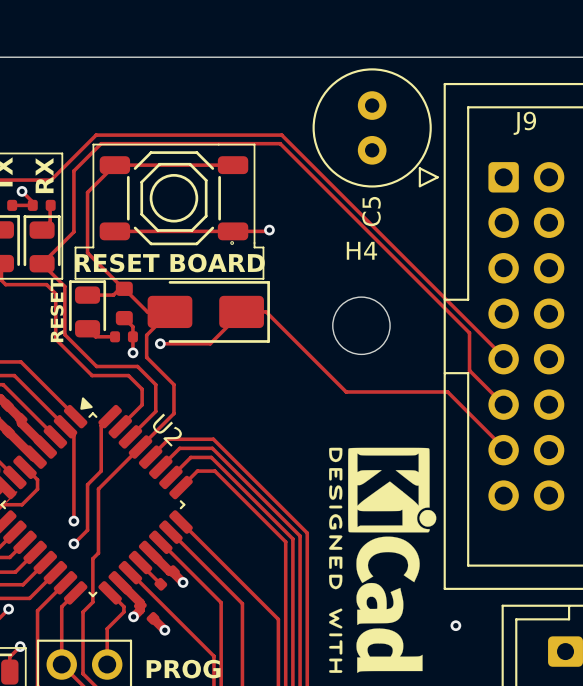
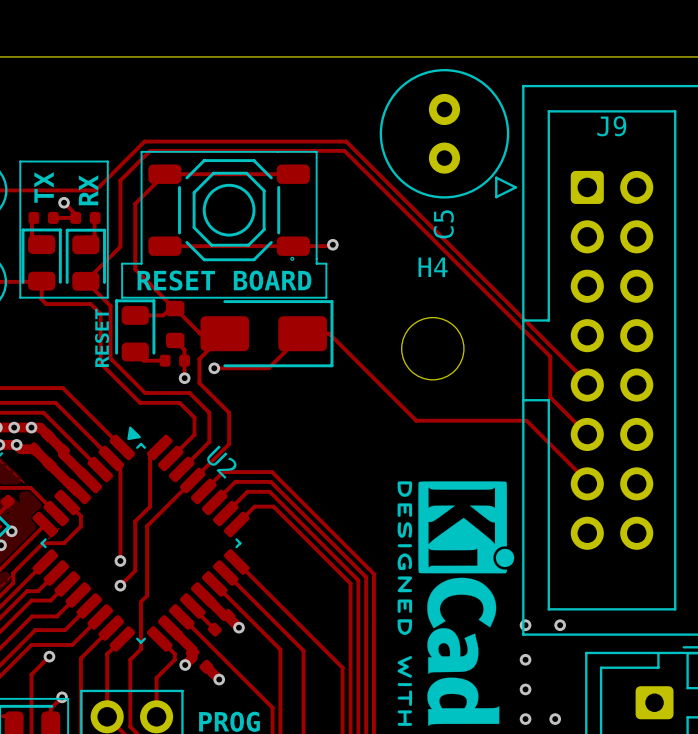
via: none -> (525, 625)
via: none -> (560, 625)
via: none -> (525, 659)
via: (455, 625) -> none
via: none -> (525, 689)
via: none -> (525, 719)
via: none -> (555, 719)

